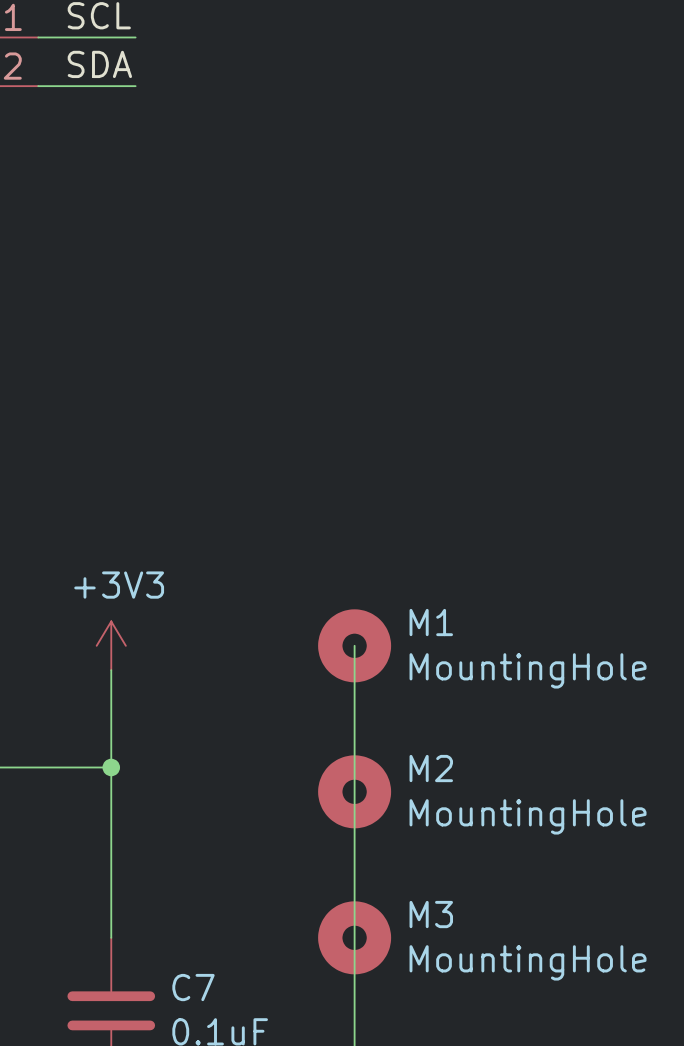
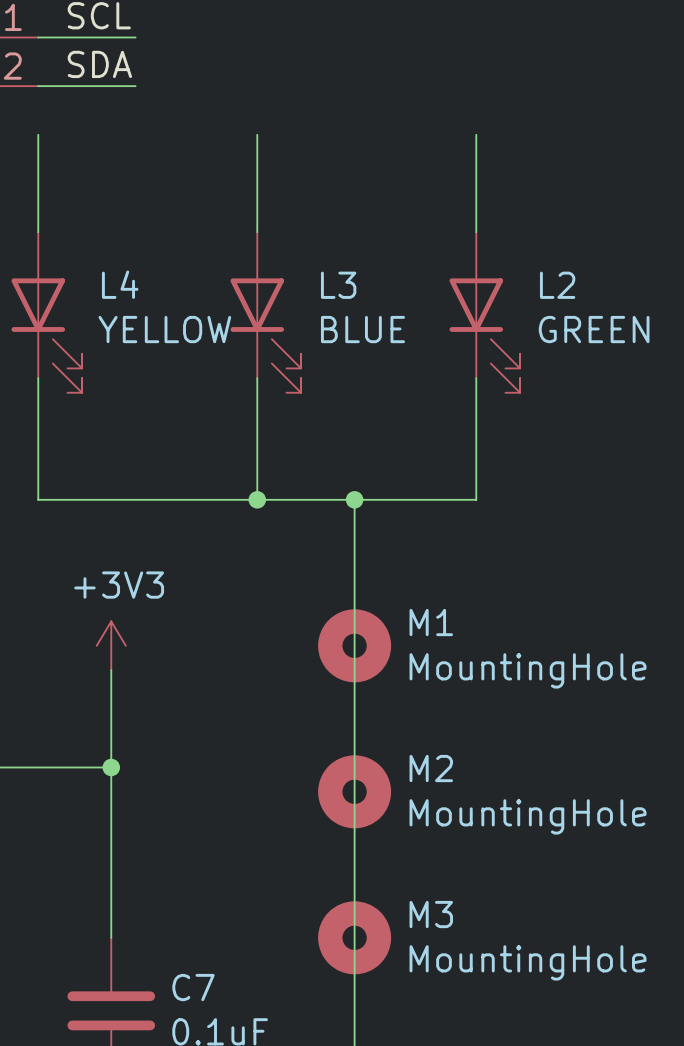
wire: none -> (38, 134) (38, 232)
wire: none -> (257, 134) (257, 232)
wire: none -> (476, 134) (476, 232)
L4: none -> YELLOW (46, 312)
L3: none -> BLUE (265, 312)
L2: none -> GREEN (484, 312)
wire: none -> (38, 378) (38, 499) (476, 499) (476, 378)
wire: none -> (257, 378) (257, 499)
junction: none -> (257, 499)
wire: none -> (354, 499) (354, 645)
junction: none -> (354, 499)

